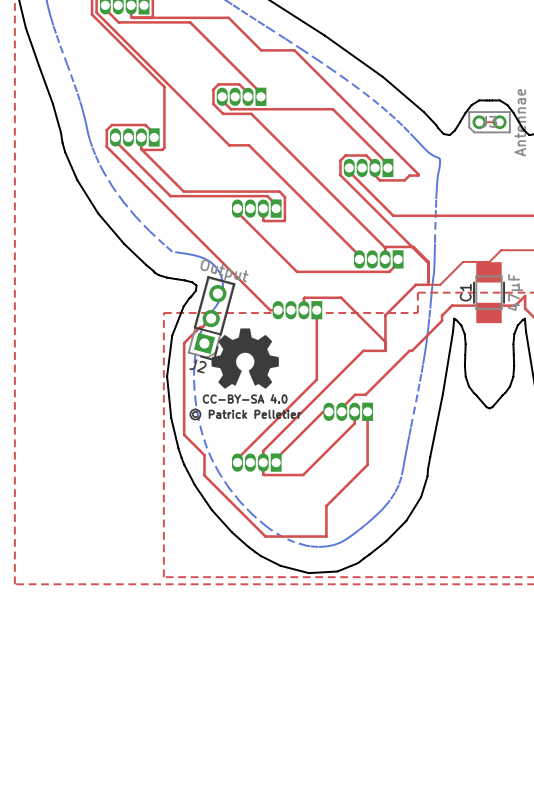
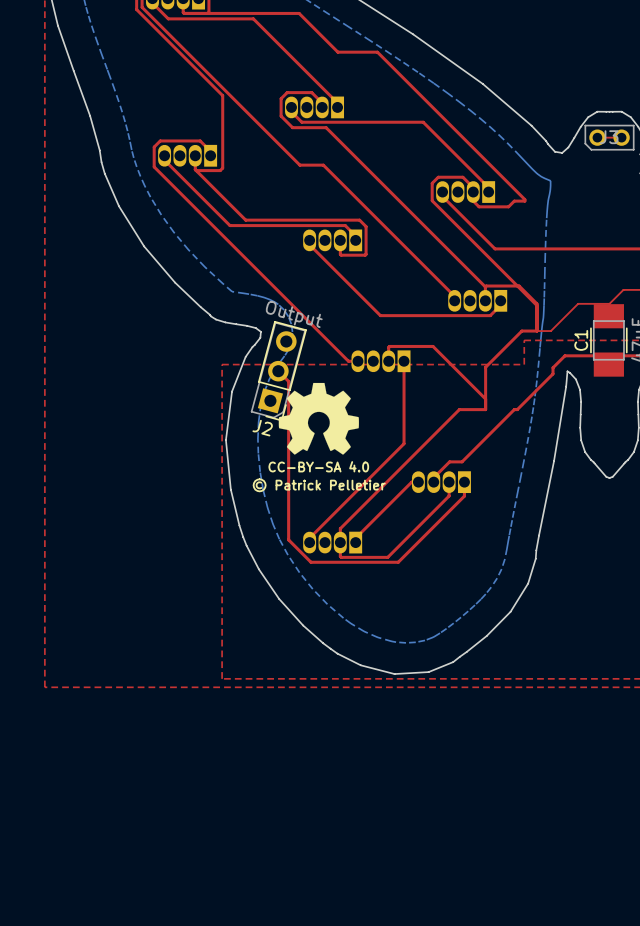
top track: (211, 318) (184, 343) (184, 434) (204, 455) (204, 475) (265, 536) (326, 536) (326, 506) (367, 464) (367, 423) -> (278, 371) (288, 381) (288, 539) (310, 562) (398, 562) (464, 496)

